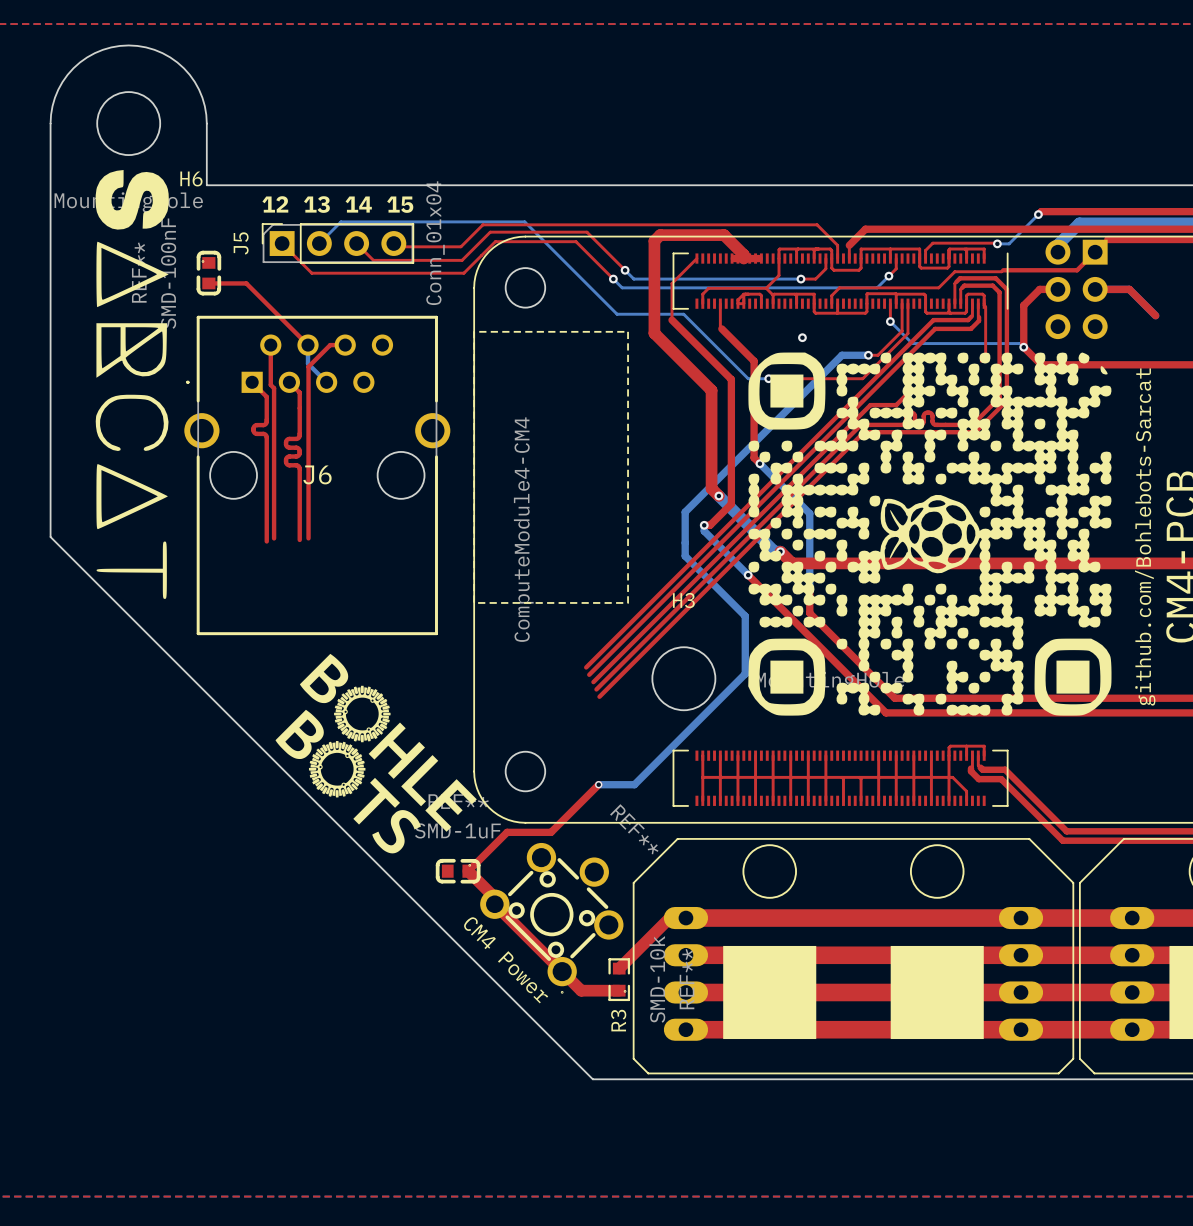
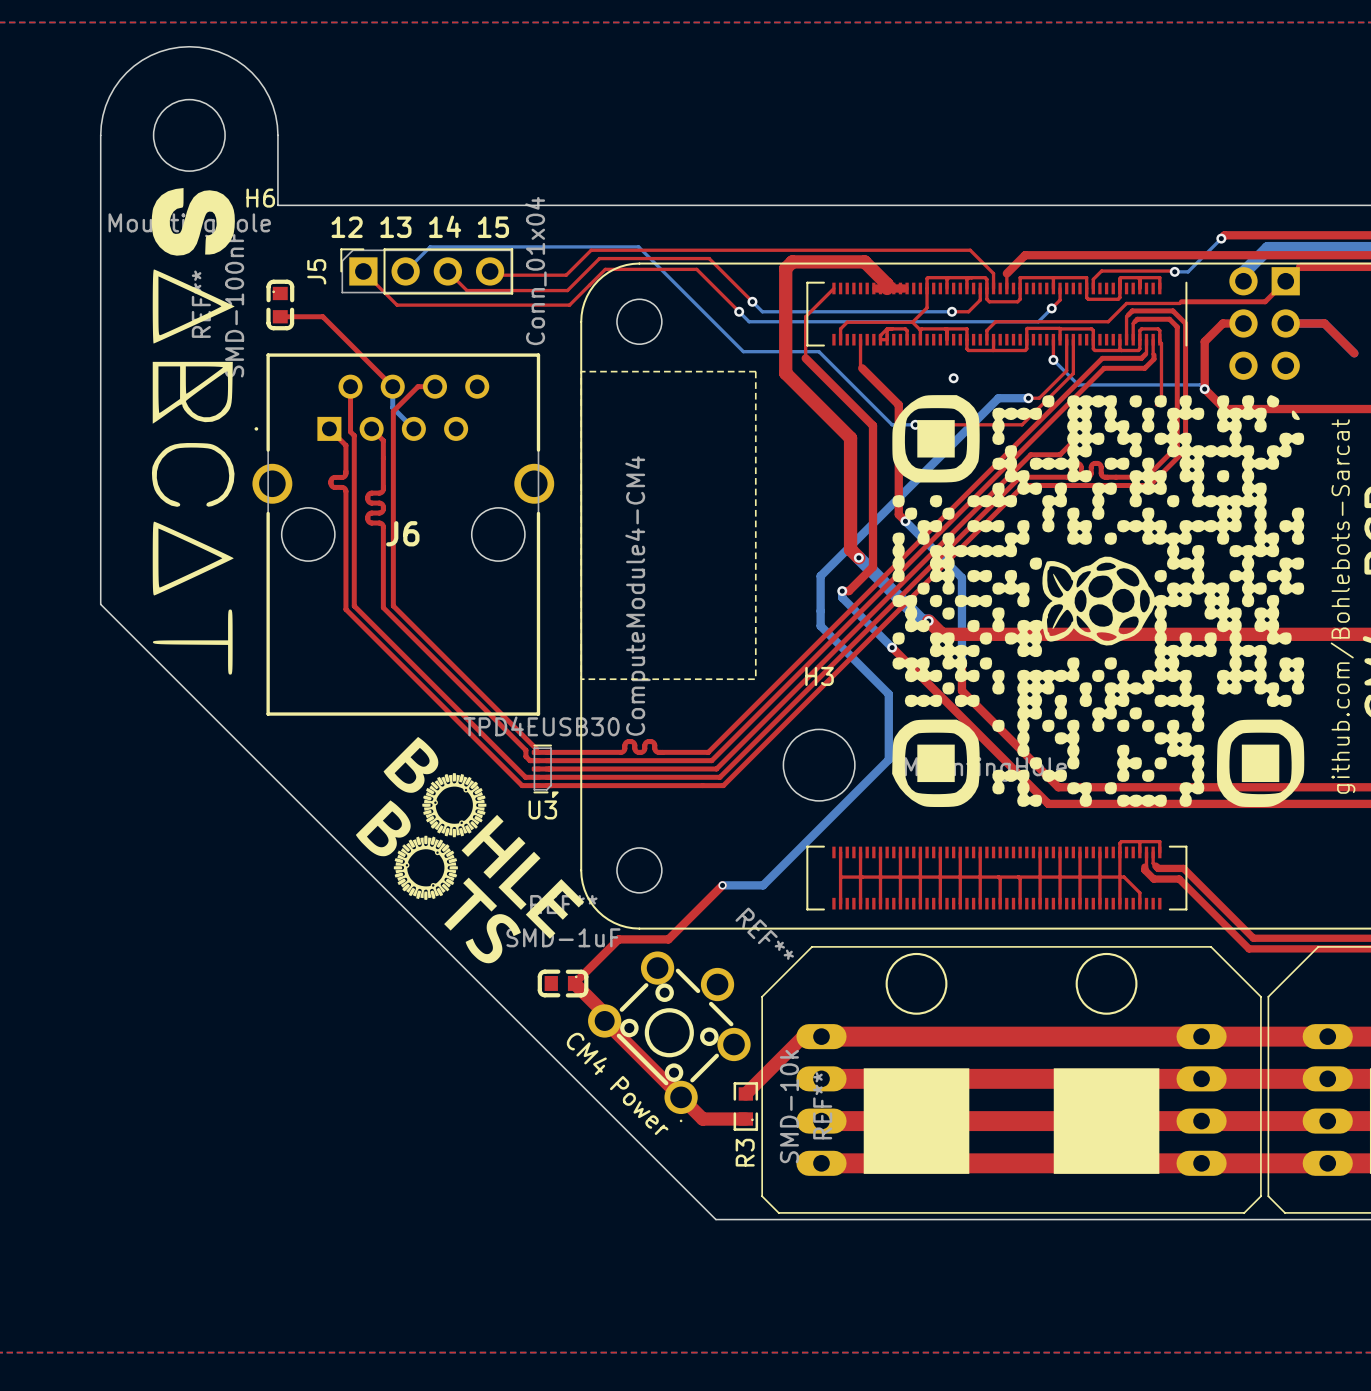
top track: none -> (354, 605) (525, 777) (719, 777)
top track: none -> (393, 605) (536, 748) (536, 752) (621, 752) (624, 750) (625, 743) (628, 741) (633, 743) (636, 751) (641, 752) (644, 750) (645, 743) (648, 741) (653, 743) (655, 750) (657, 752) (708, 752)
top track: none -> (383, 607) (525, 750) (525, 756) (530, 760) (711, 760)
top track: none -> (345, 609) (522, 785) (723, 785)
top track: none -> (536, 768) (716, 768)
U3: none -> TPD4EUSB30 (545, 771)

